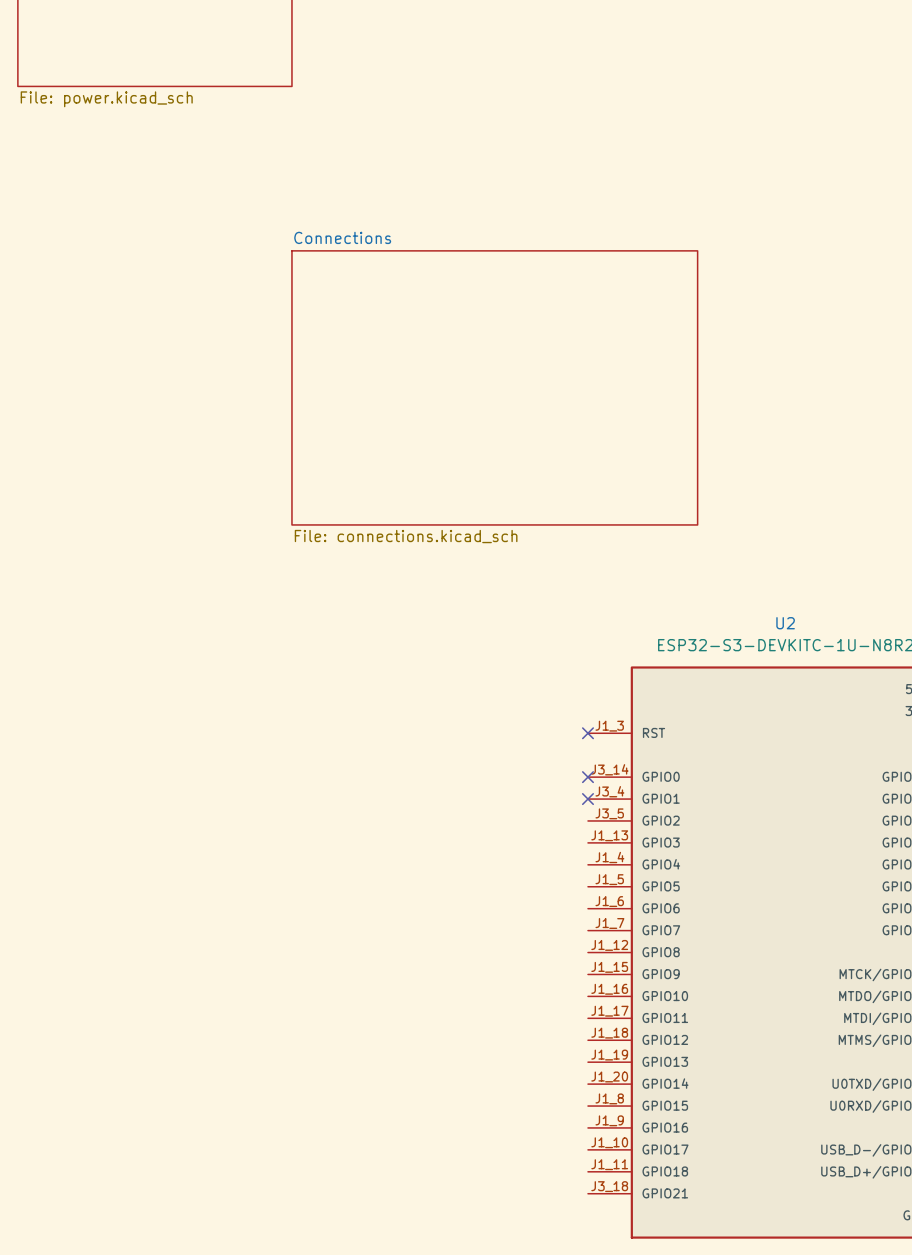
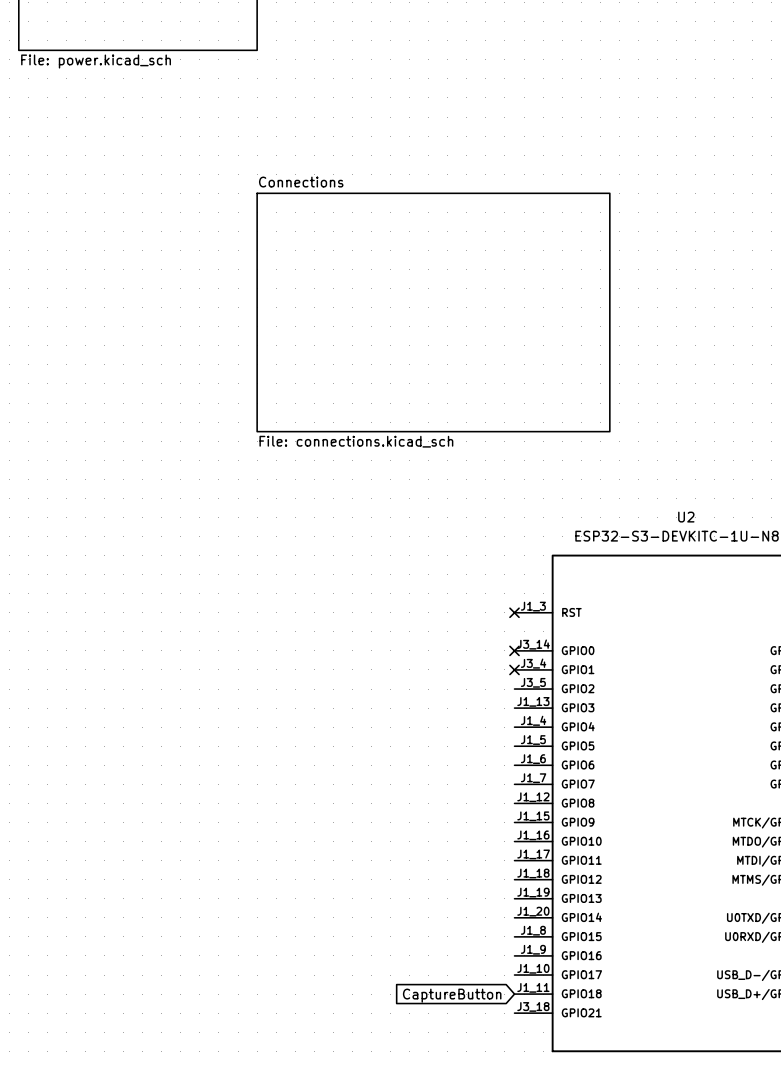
global label: none -> CaptureButton (452, 995)

